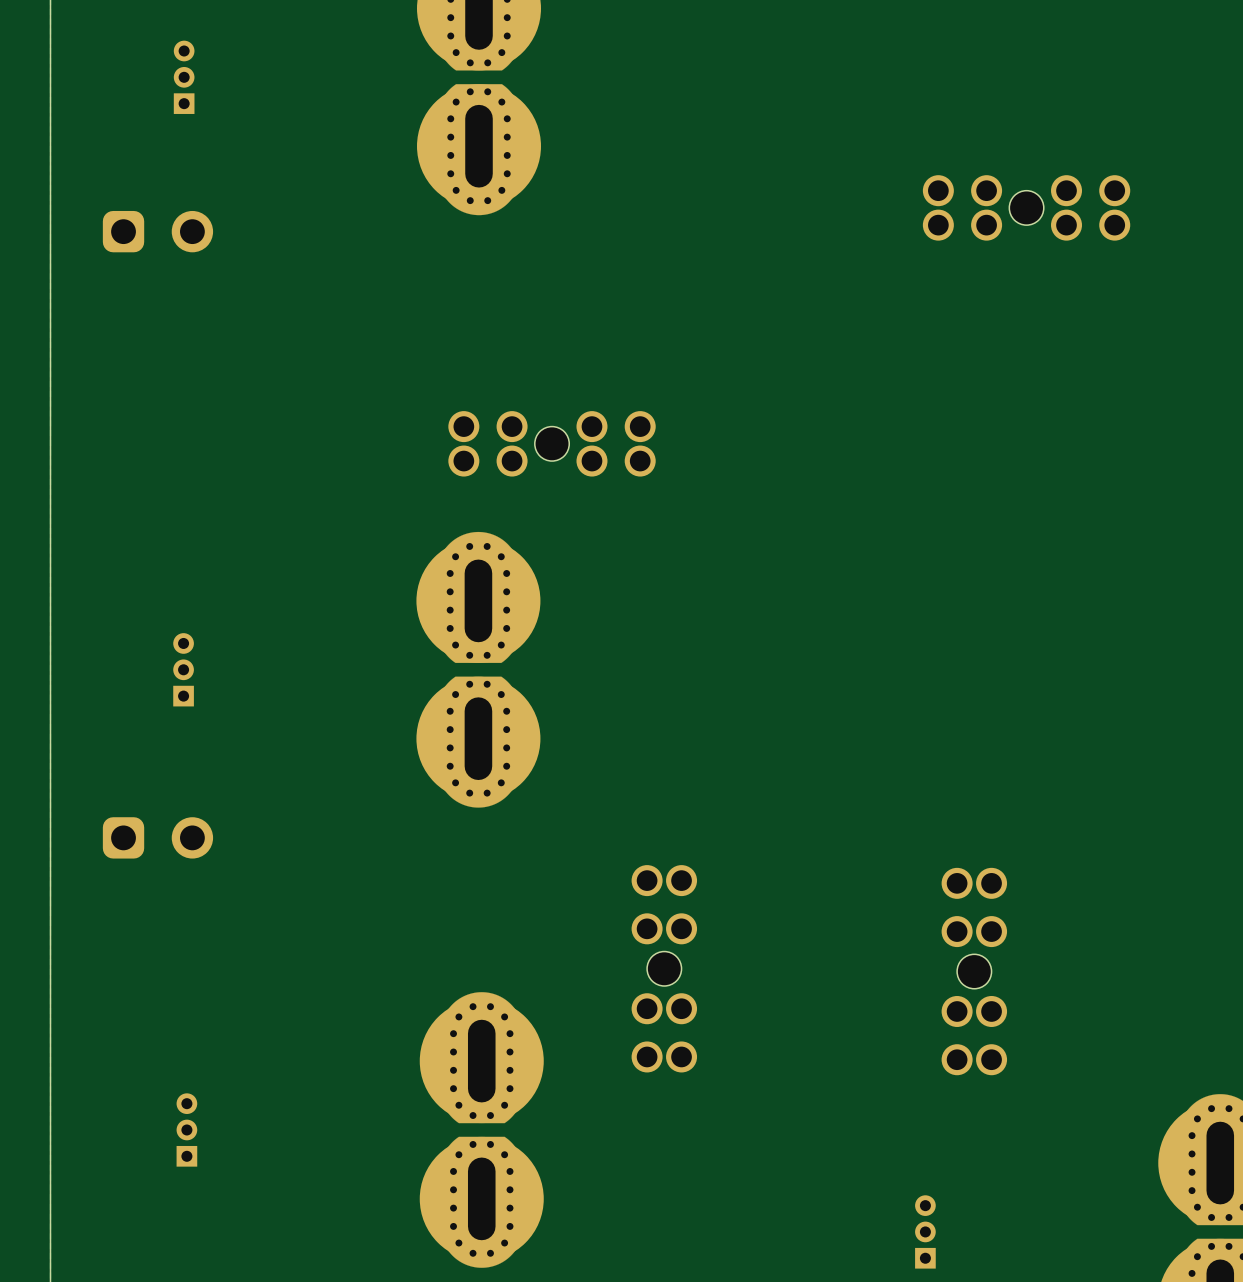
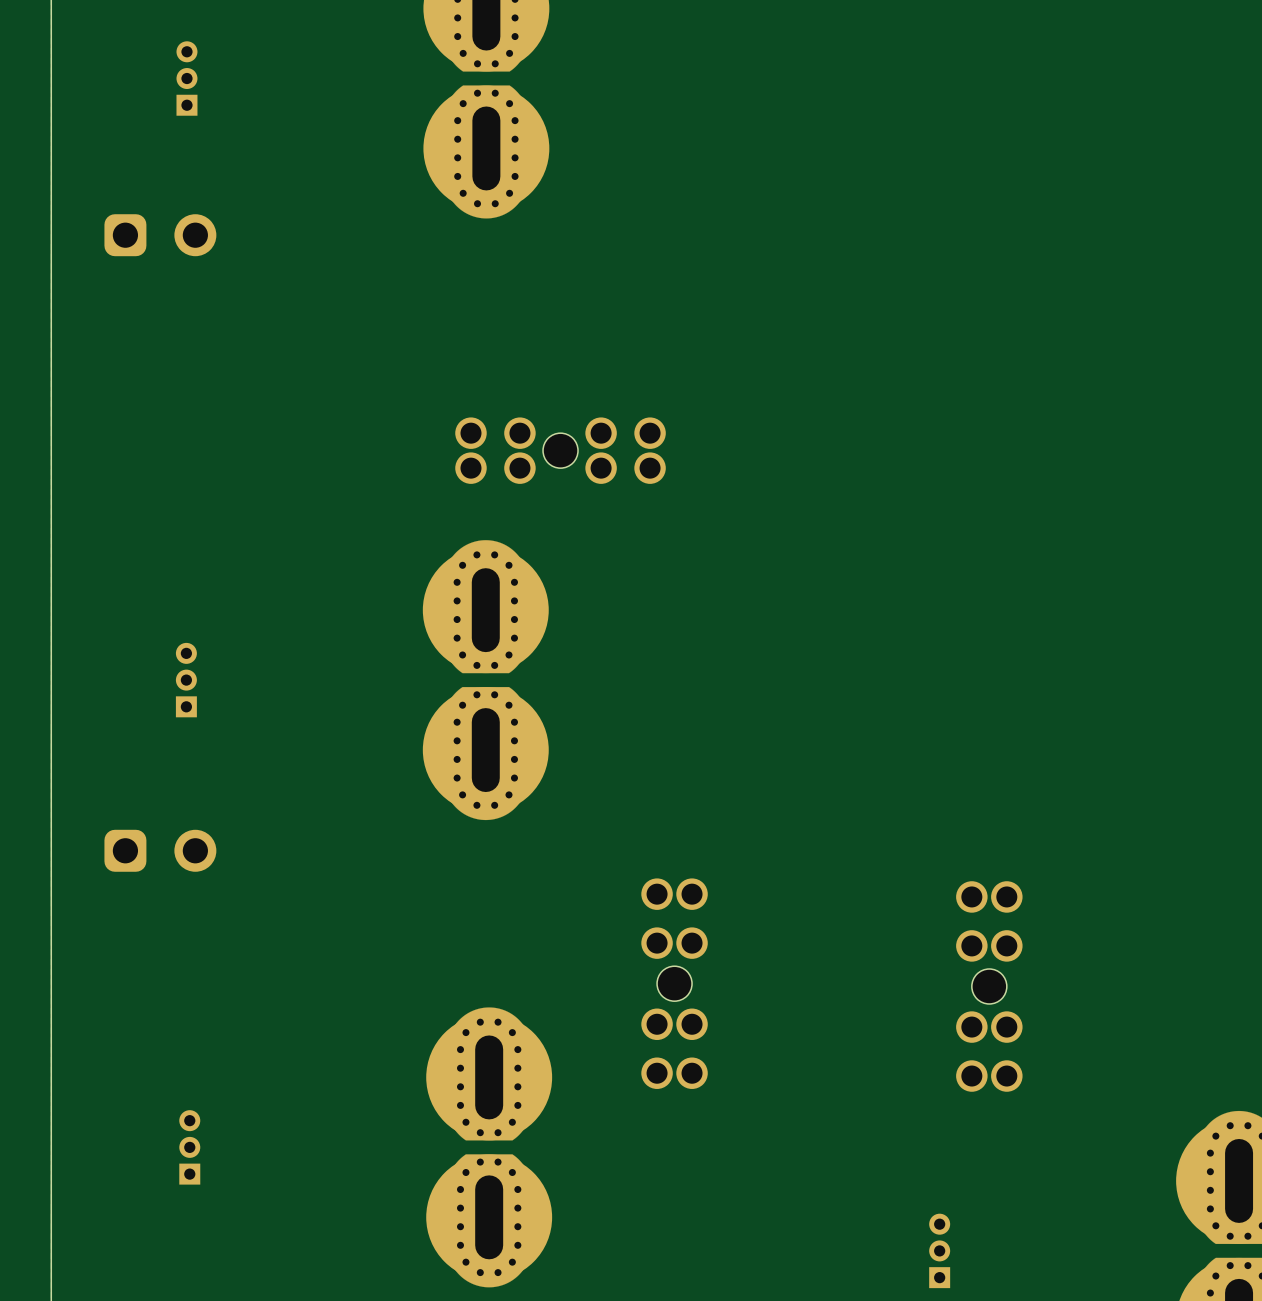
part: (1026, 207) -> none

